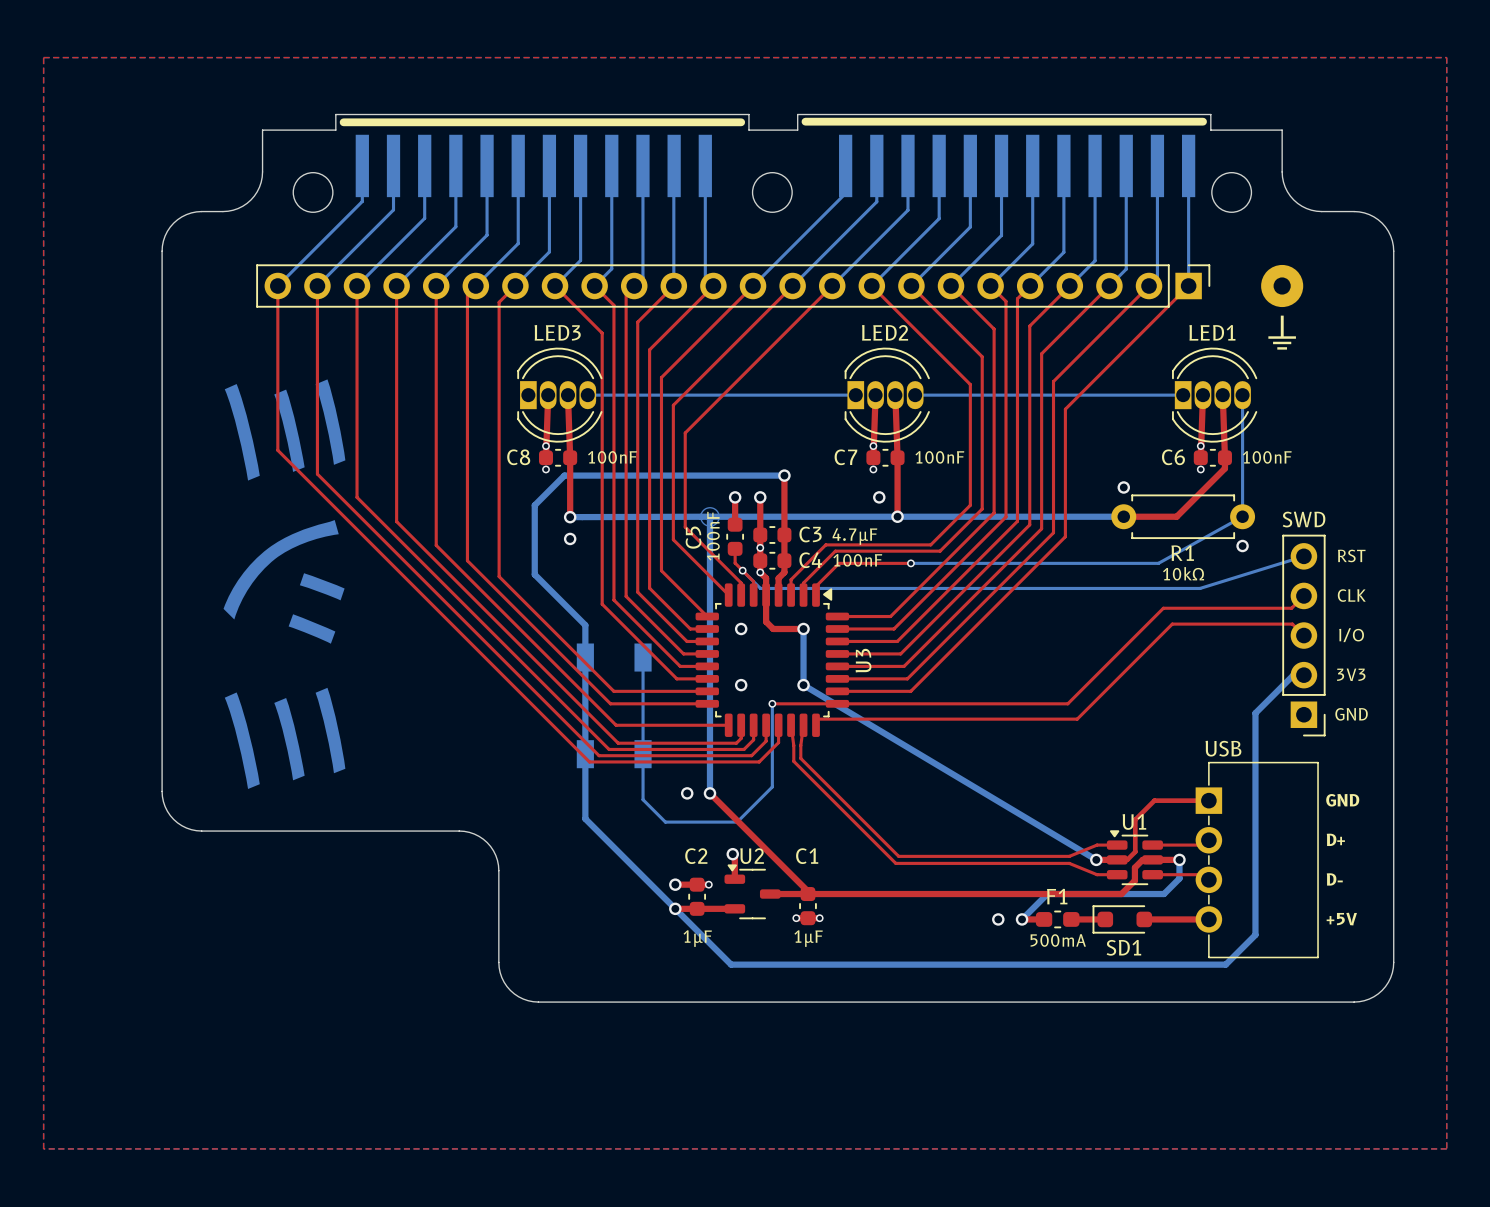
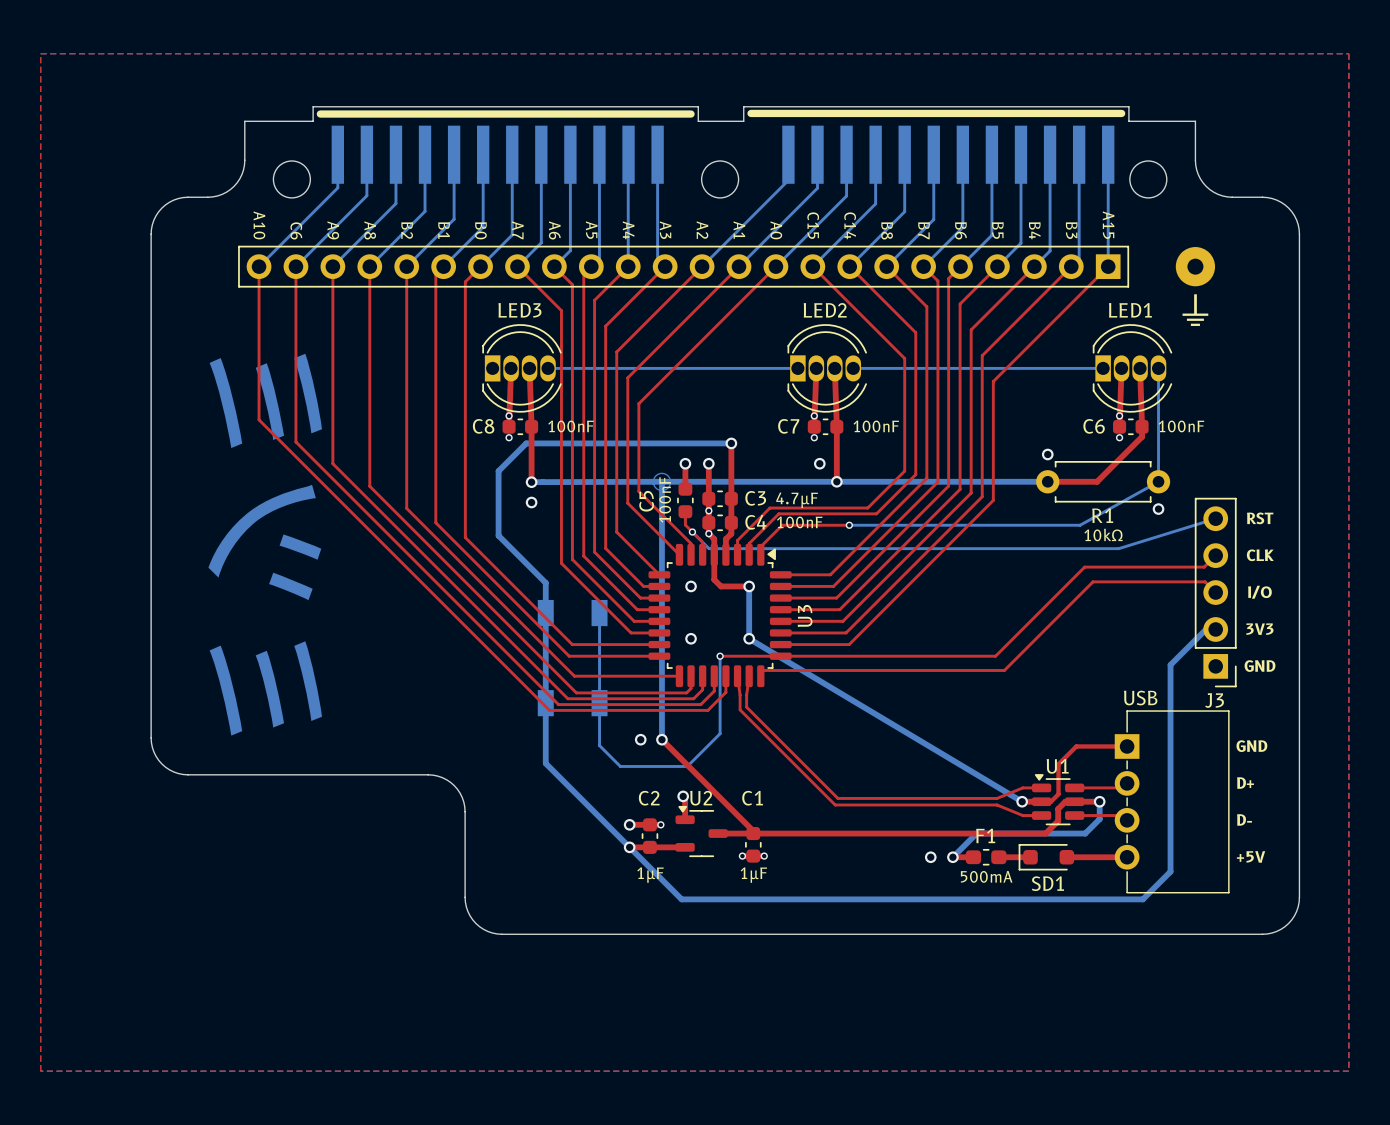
part footprint: [256, 264, 1211, 308] -> [238, 245, 1130, 288]
part: SWD (1303, 635) -> none
J3: none -> (1215, 592)

